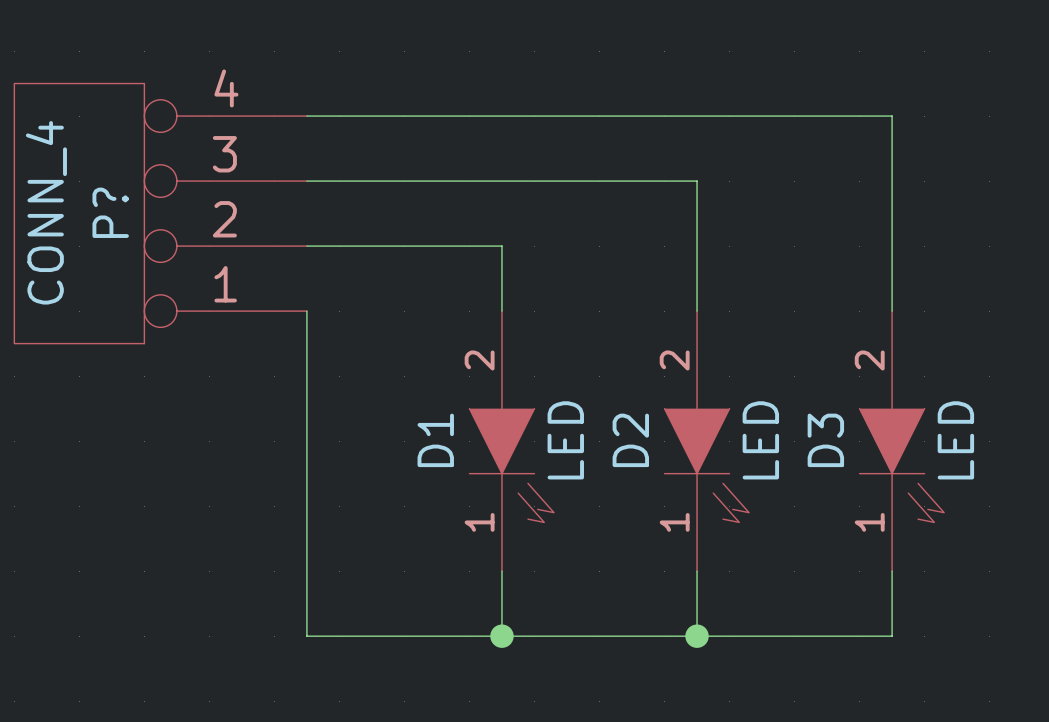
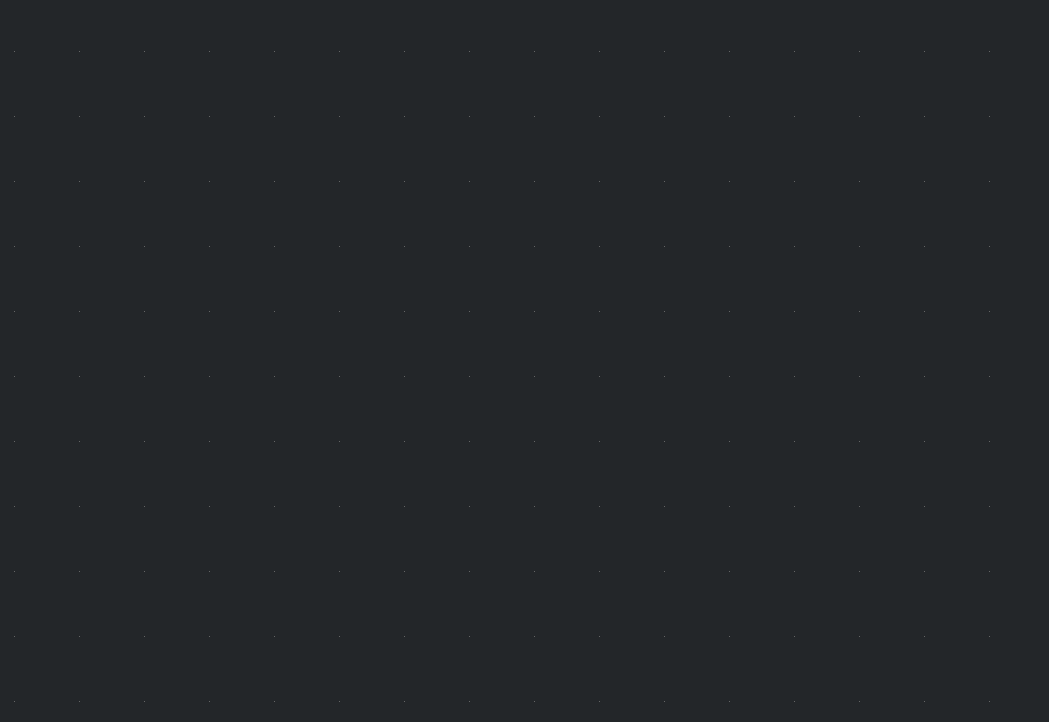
wire: (306, 116) (892, 116) (892, 311) -> none
wire: (306, 181) (697, 181) (697, 311) -> none
P?: CONN_4 (160, 213) -> none
wire: (306, 246) (501, 246) (501, 311) -> none
wire: (306, 311) (306, 636) (892, 636) (892, 571) -> none
D1: LED (511, 441) -> none
D2: LED (706, 441) -> none
D3: LED (901, 441) -> none
wire: (501, 571) (501, 636) -> none
wire: (697, 571) (697, 636) -> none
junction: (501, 636) -> none
junction: (697, 636) -> none

